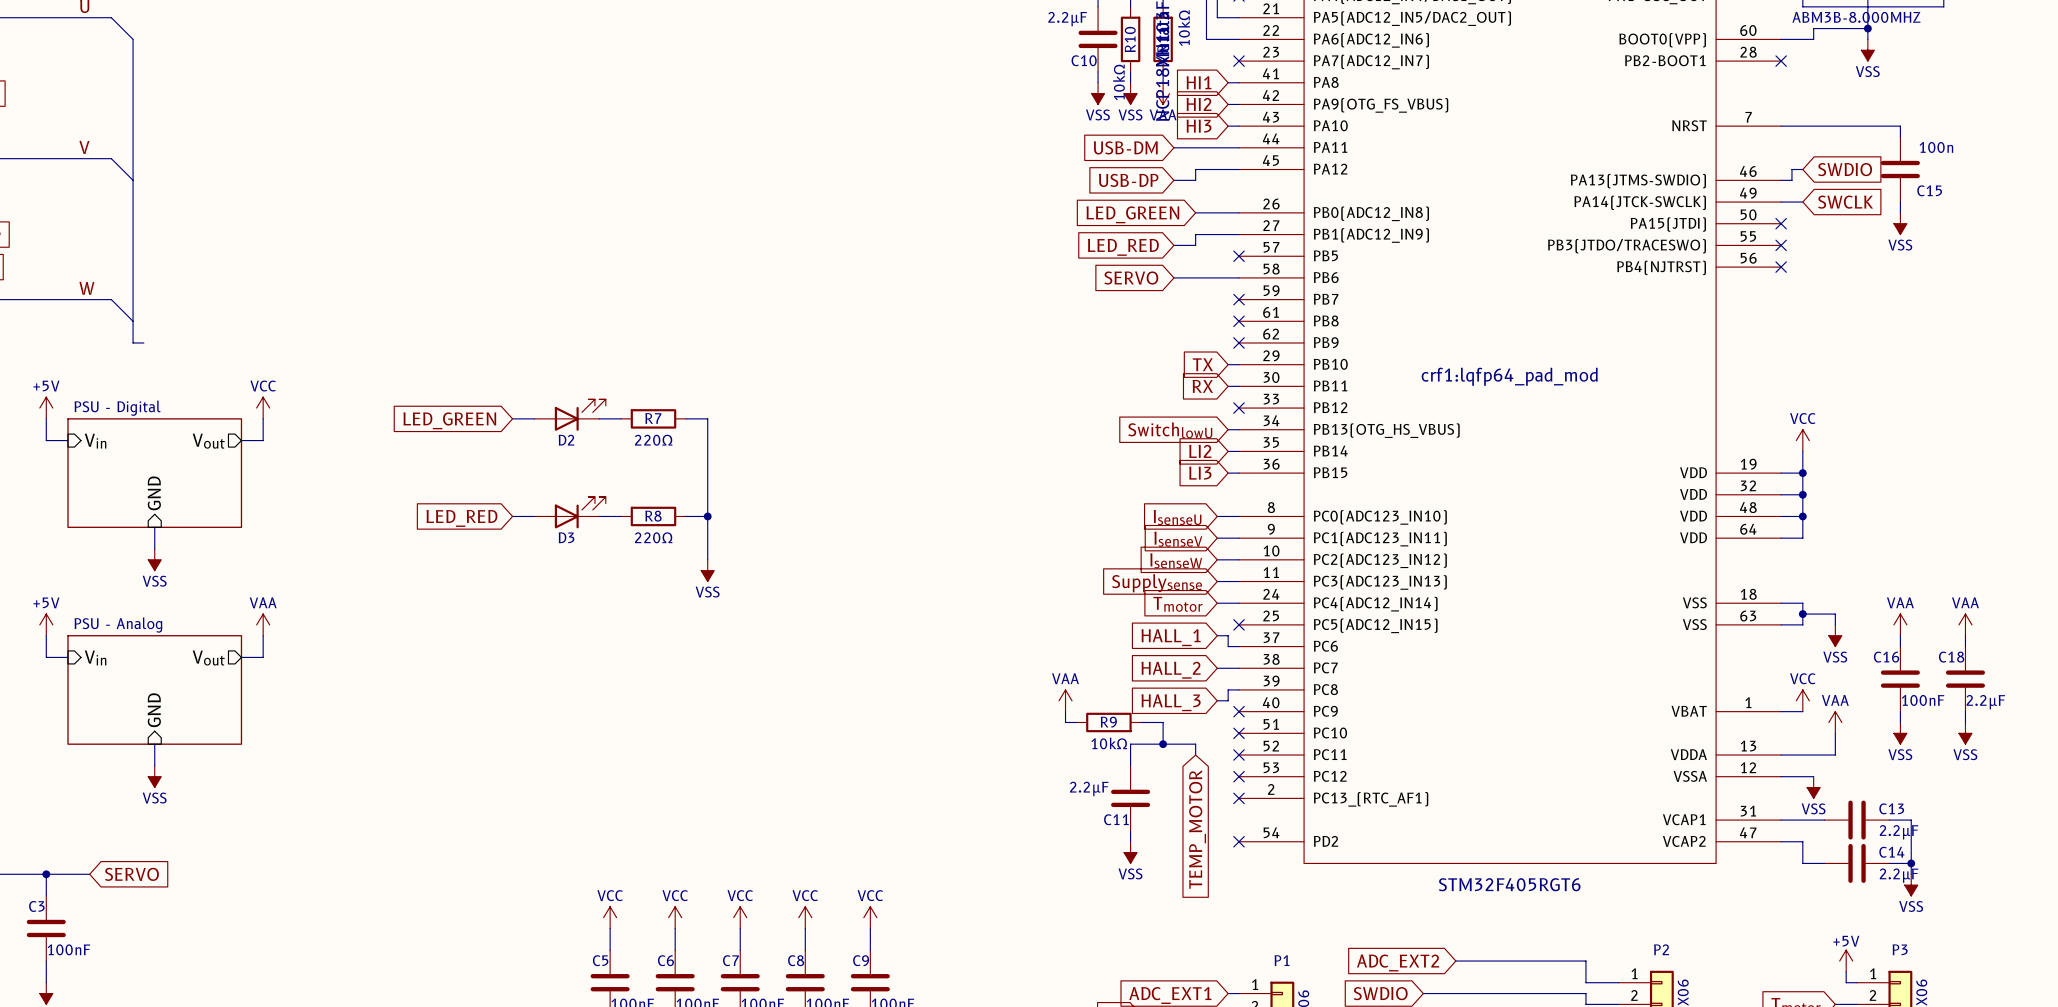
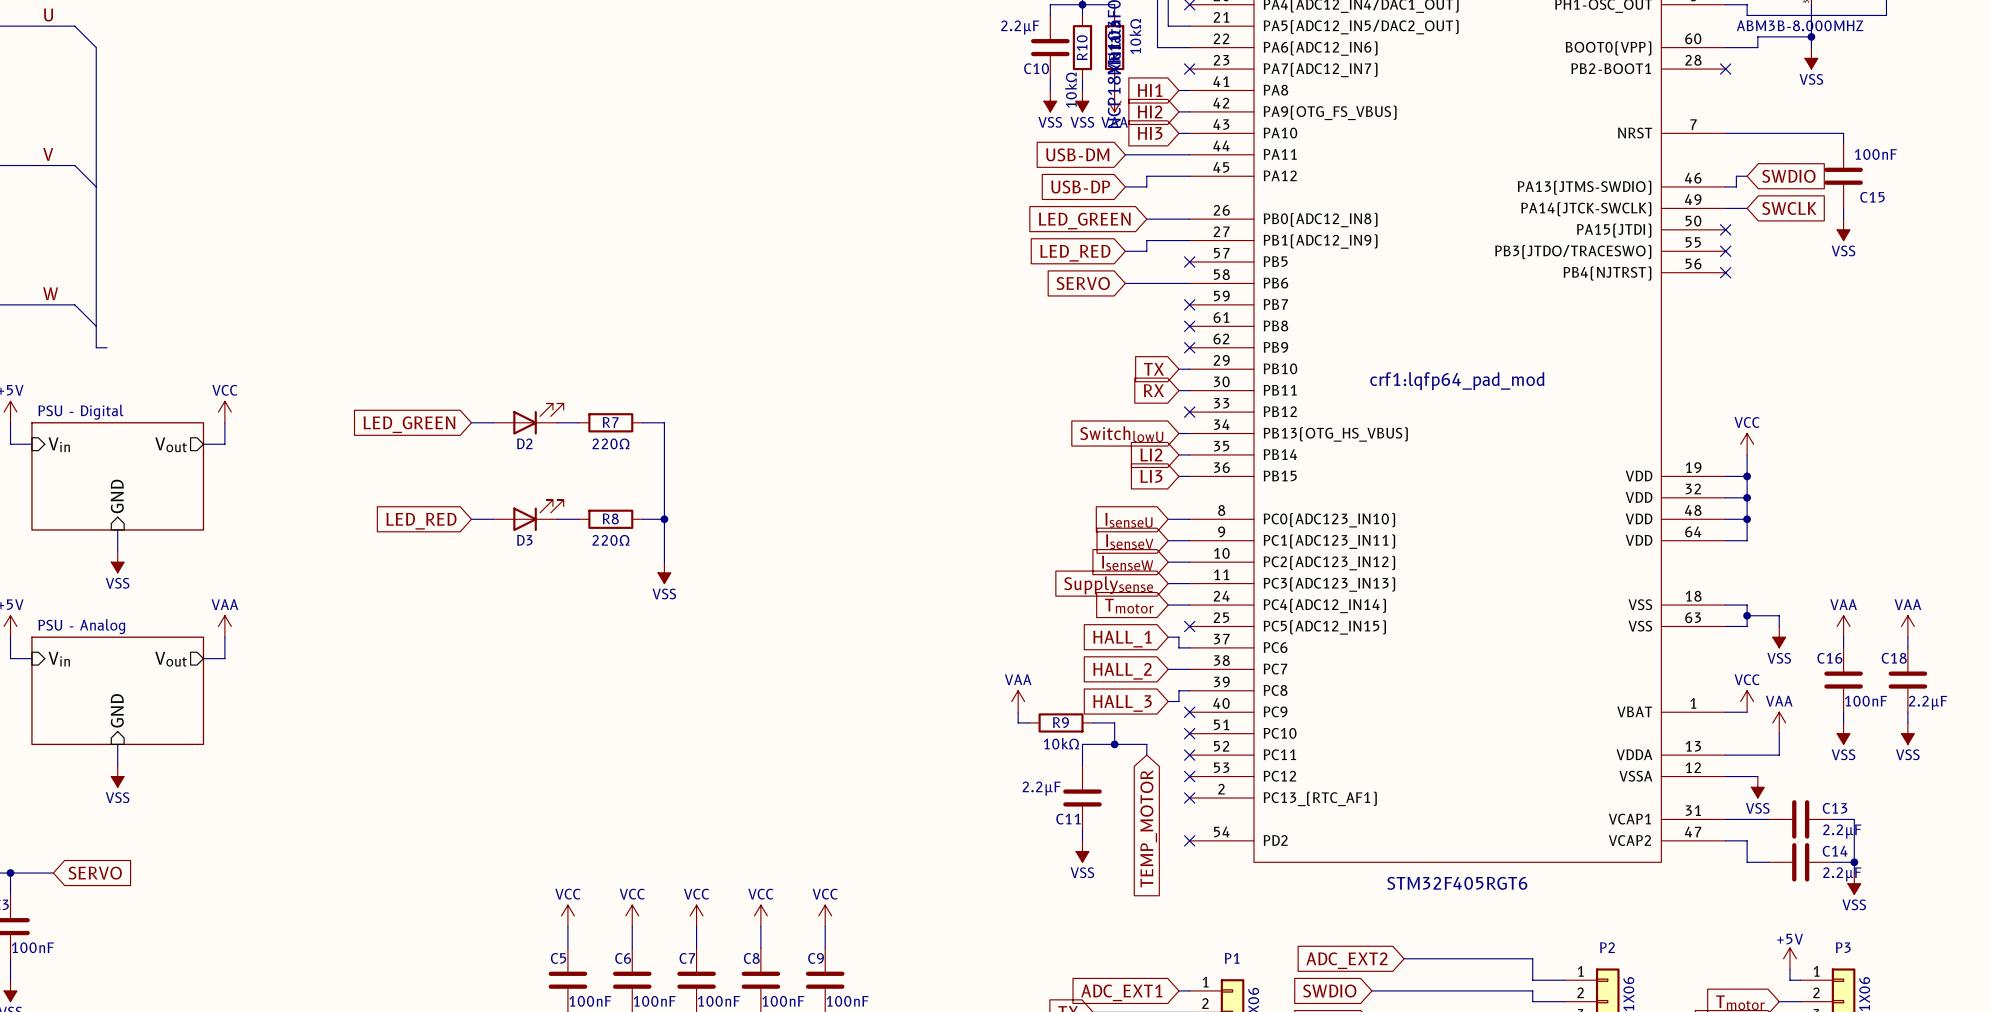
C15 value: 100n (1936, 147) -> 100nF (1875, 154)

